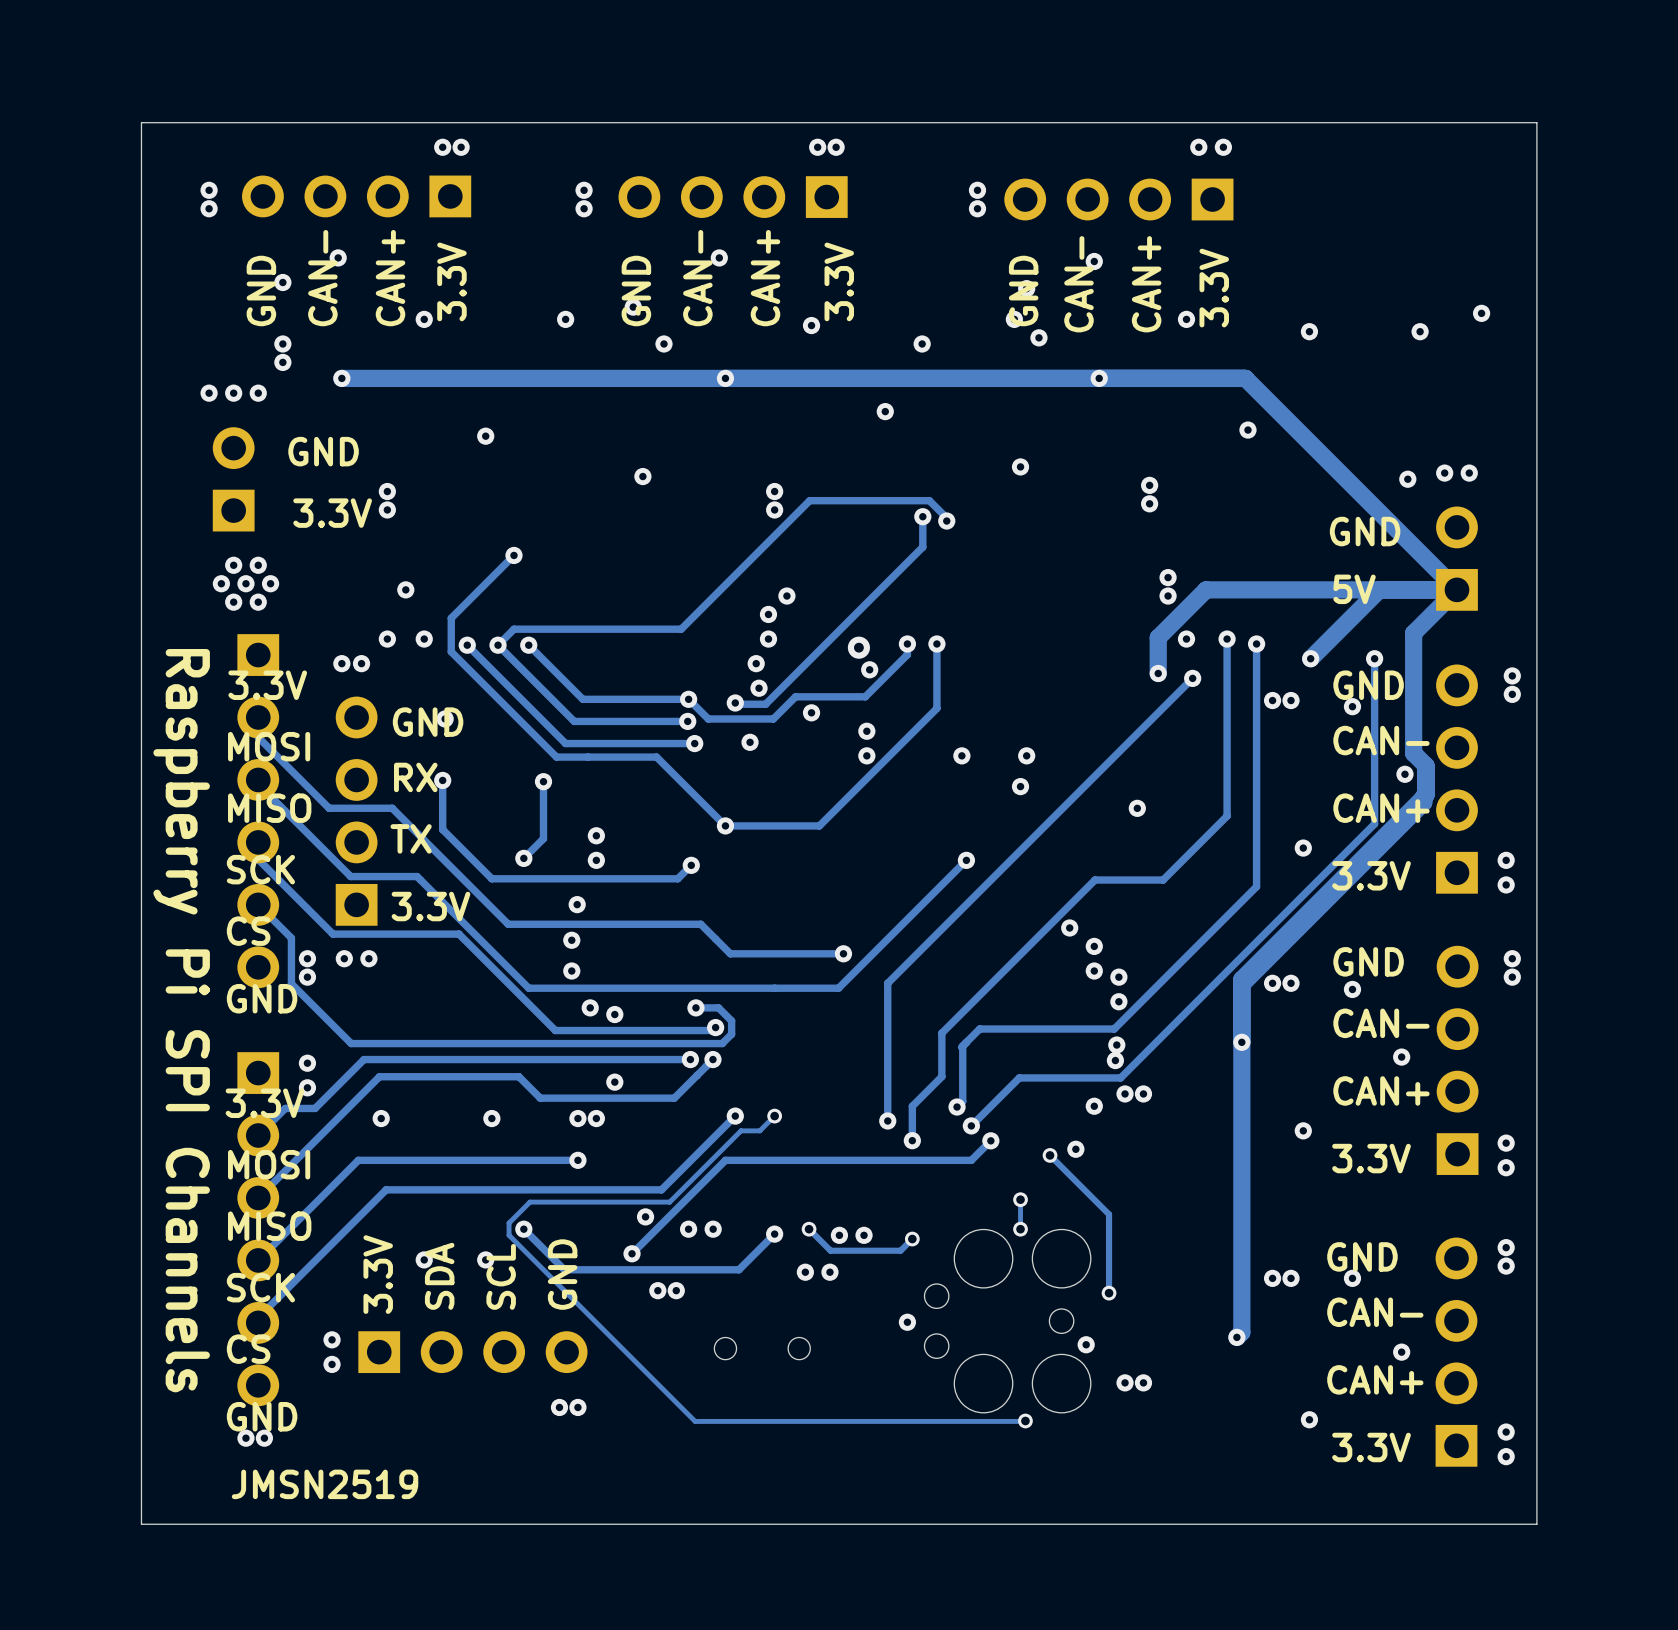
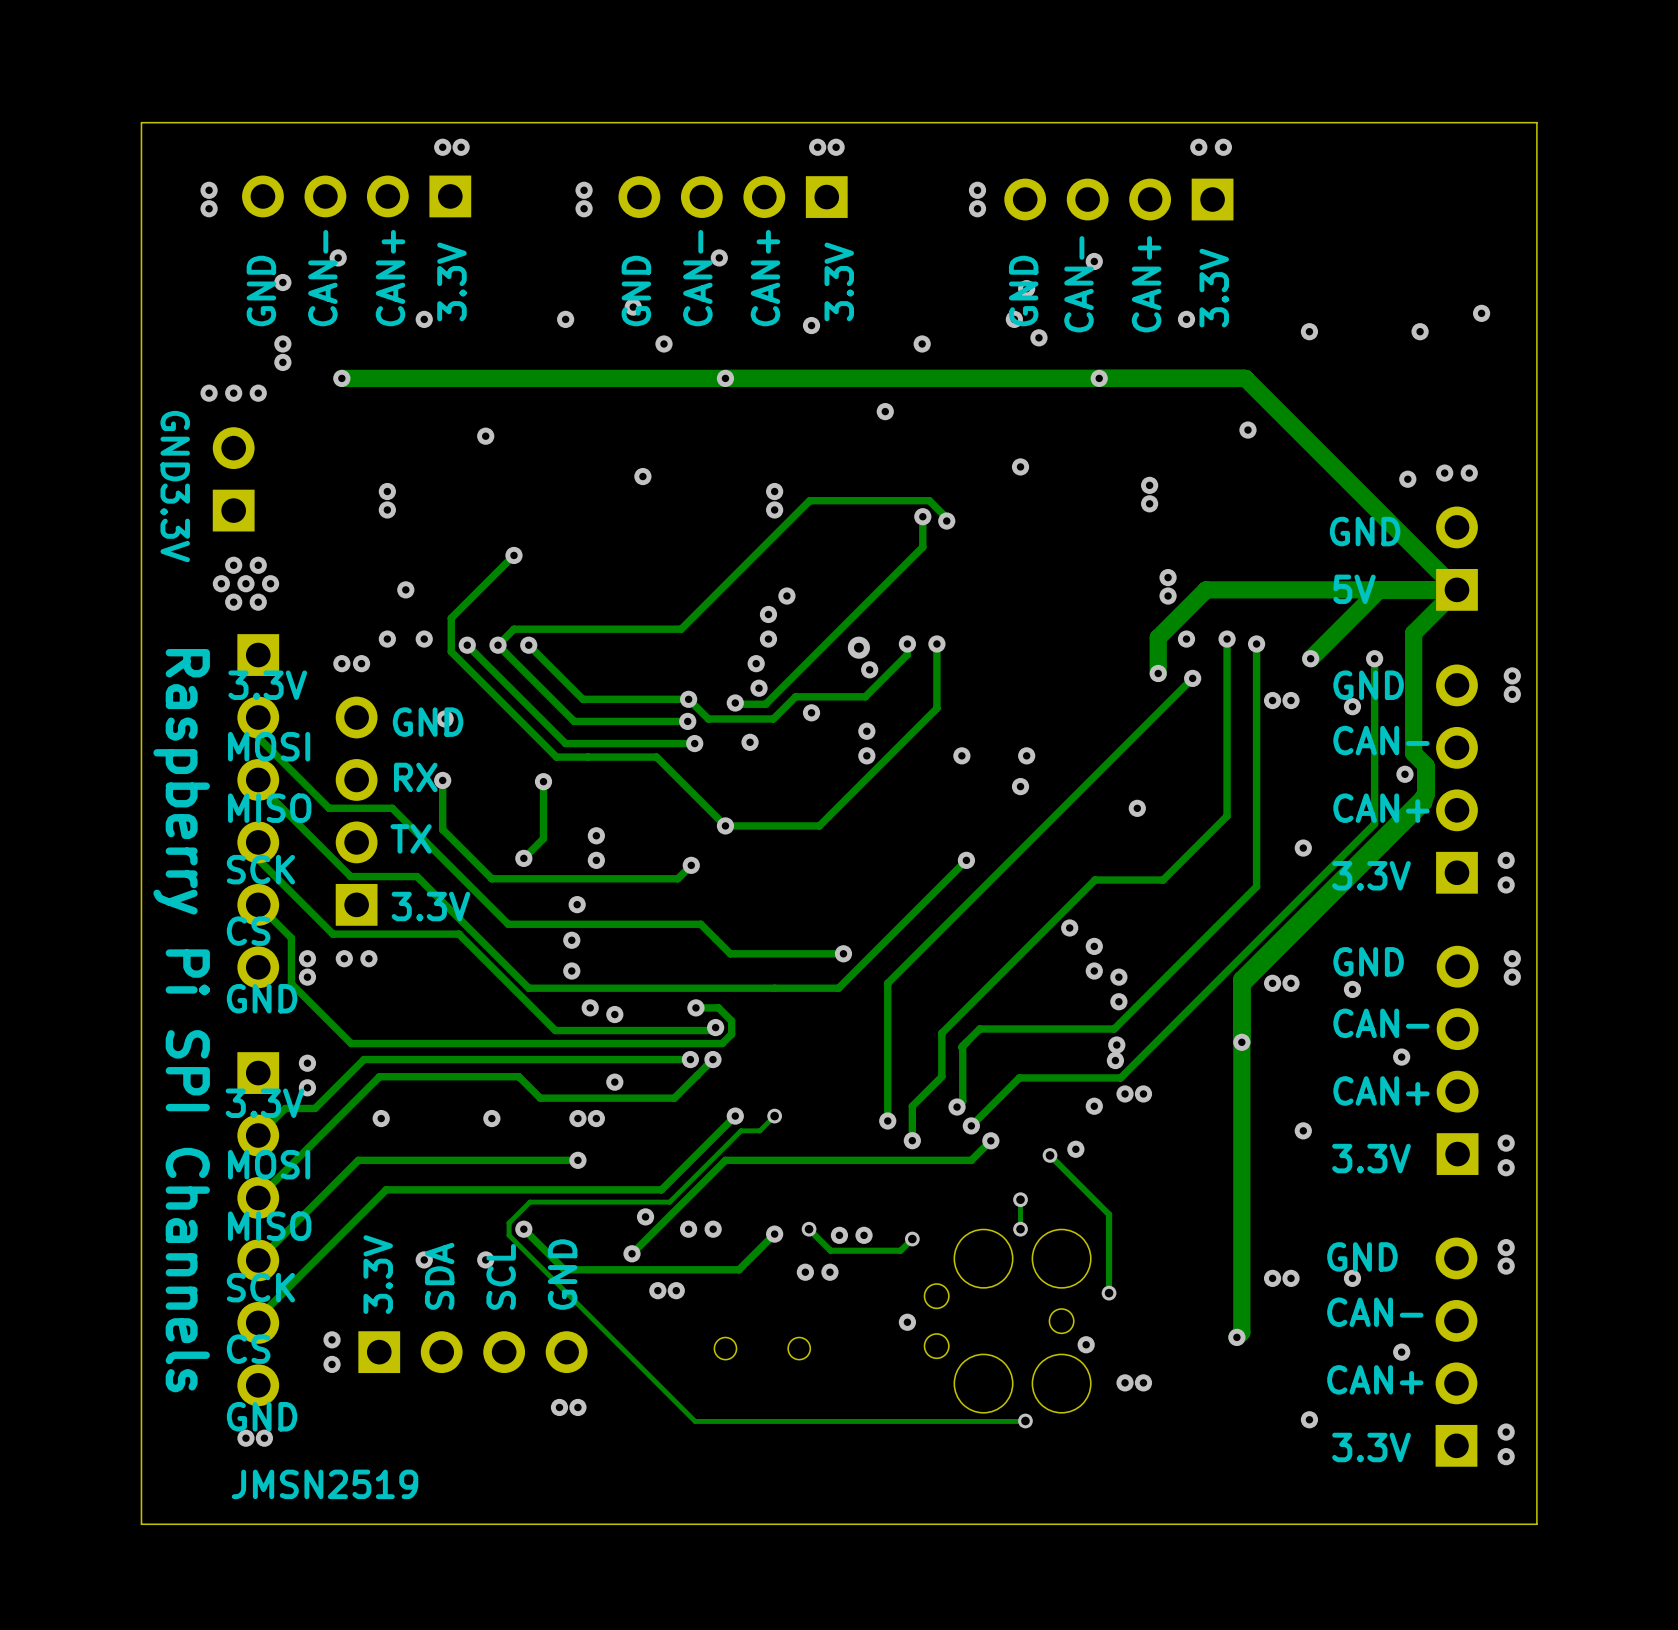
text rotation: 0° (323, 451) -> 90° clockwise (175, 446)
text position: GND (323, 451) -> GND (175, 446)
text rotation: 0° (332, 513) -> 90° clockwise (175, 522)
text position: 3.3V (332, 513) -> 3.3V (175, 522)

